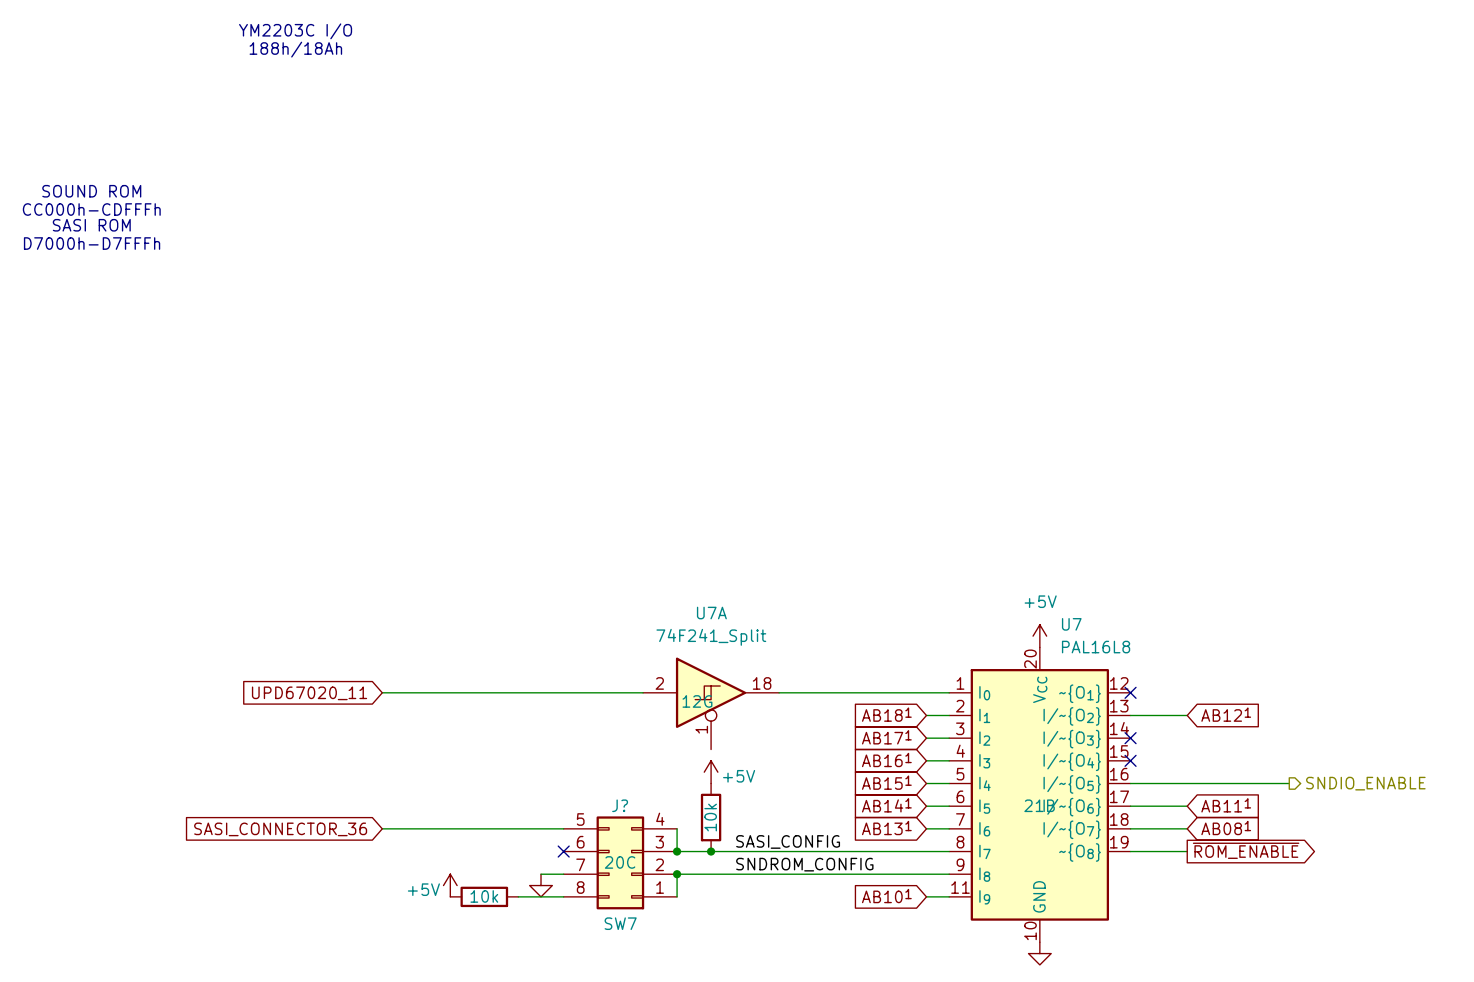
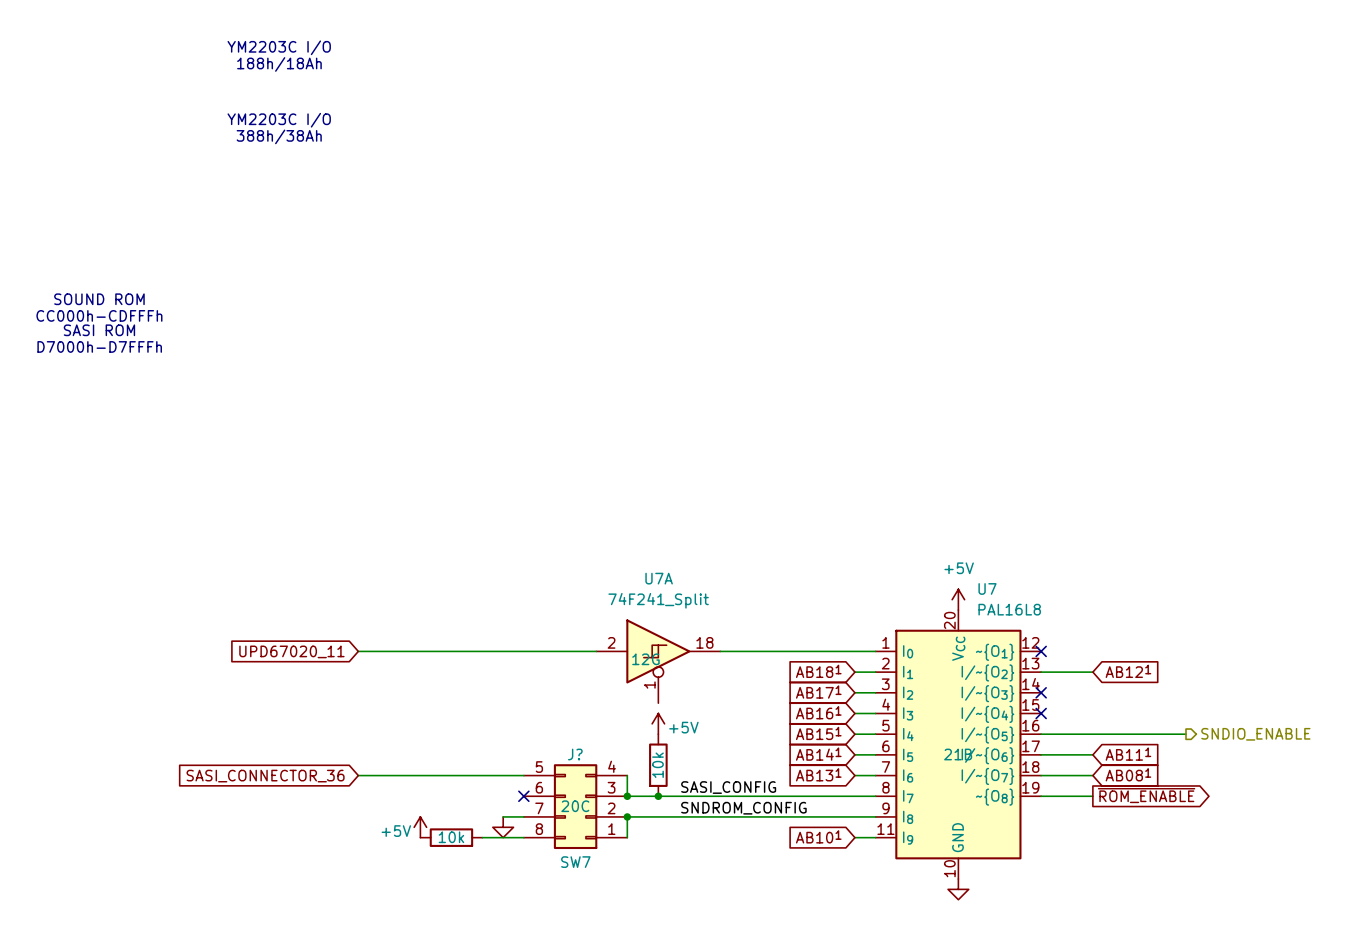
text: none -> YM2203C I/O (279, 120)
text: none -> 388h/38Ah (279, 136)
text position: SOUND ROM (91, 191) -> SOUND ROM (99, 299)
text position: CC000h-CDFFFh (91, 209) -> CC000h-CDFFFh (99, 315)
text position: SASI ROM (91, 225) -> SASI ROM (99, 330)
text position: D7000h-D7FFFh (92, 243) -> D7000h-D7FFFh (99, 346)

